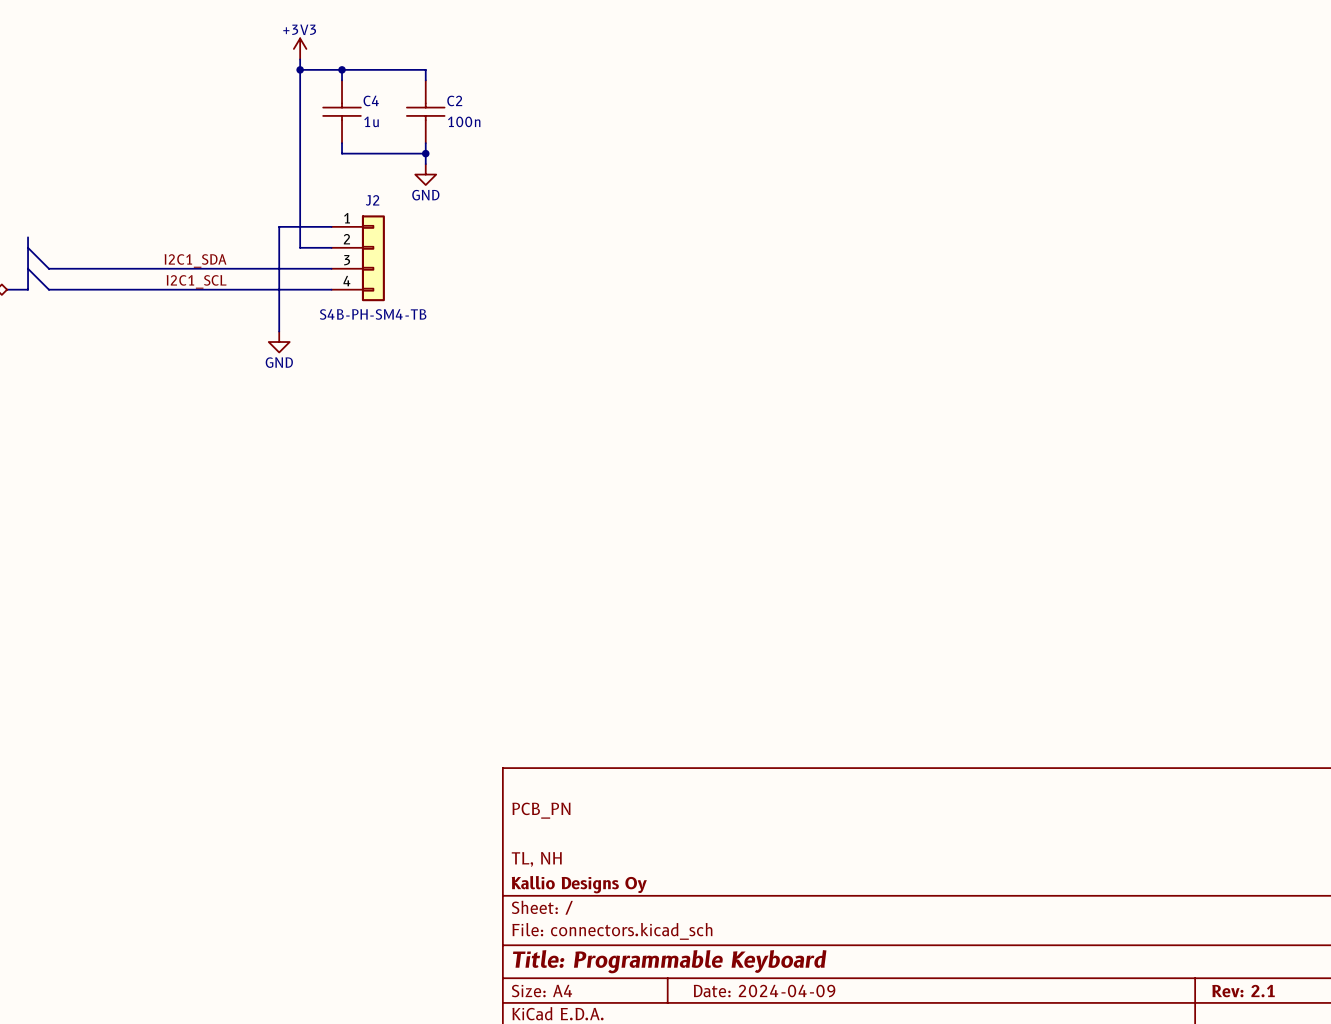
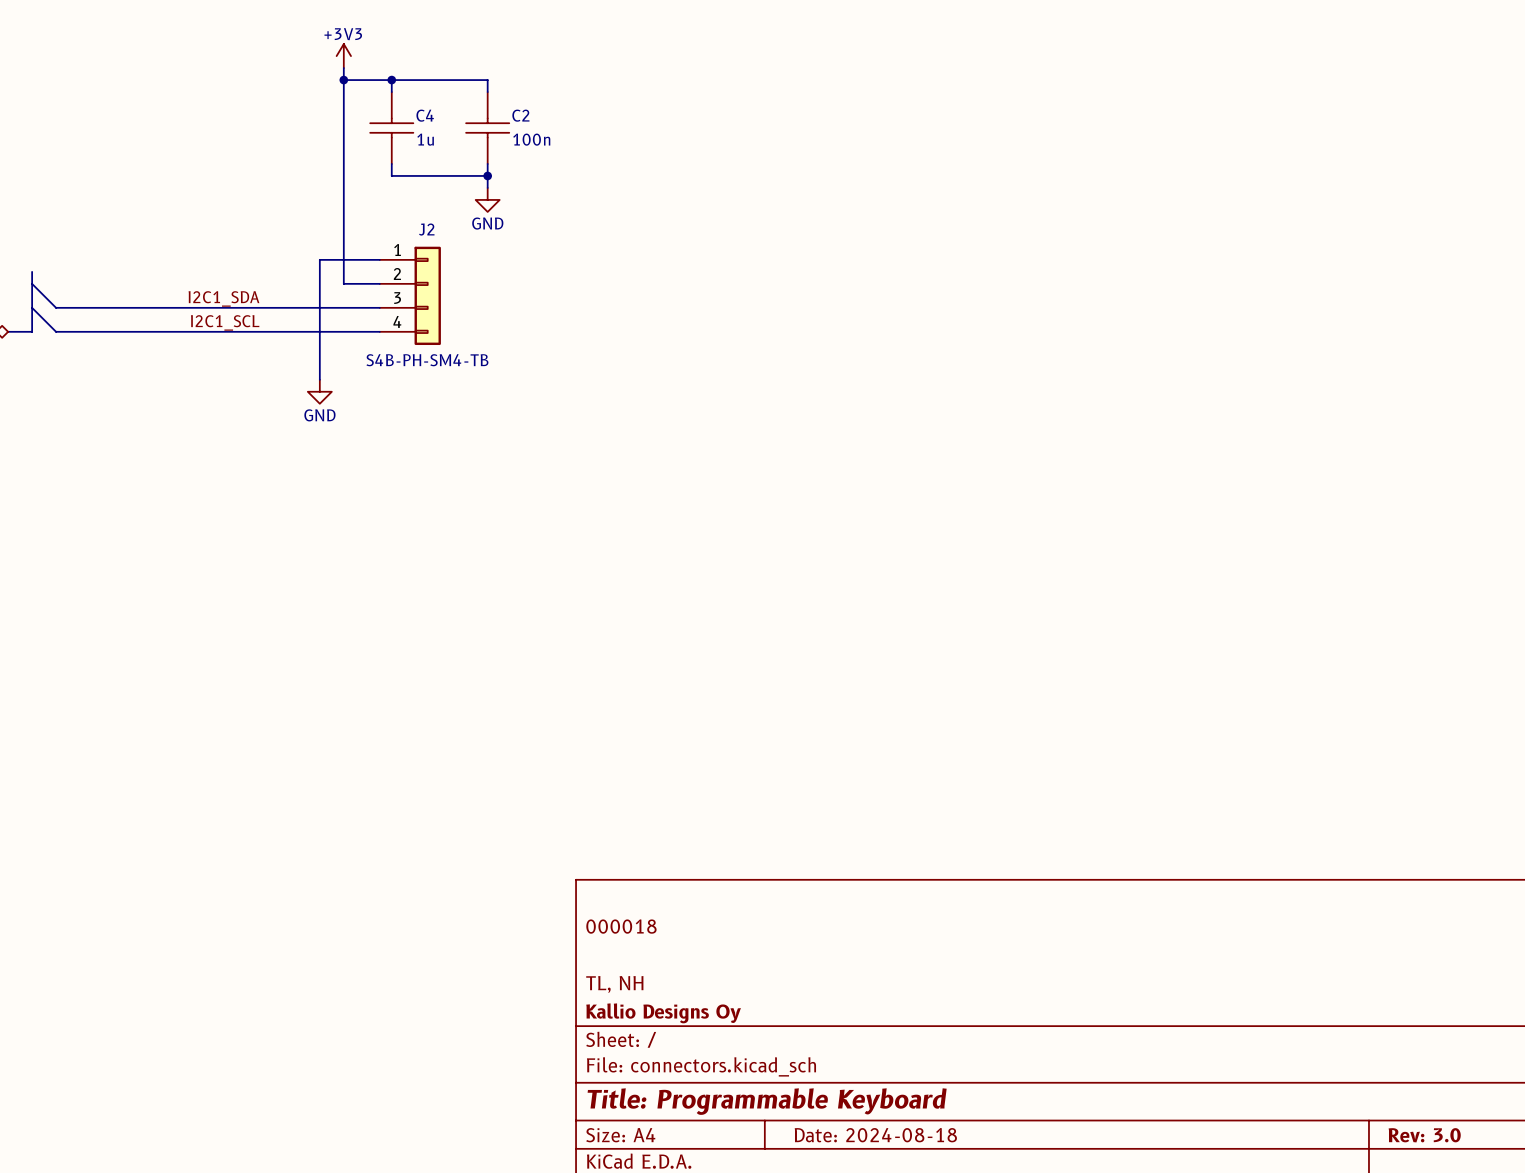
title block: PCB_PN (541, 810) -> 000018 (621, 926)
title block: Date: 2024-04-09 (764, 991) -> Date: 2024-08-18 (875, 1135)
title block: Rev: 2.1 (1243, 991) -> Rev: 3.0 (1424, 1135)

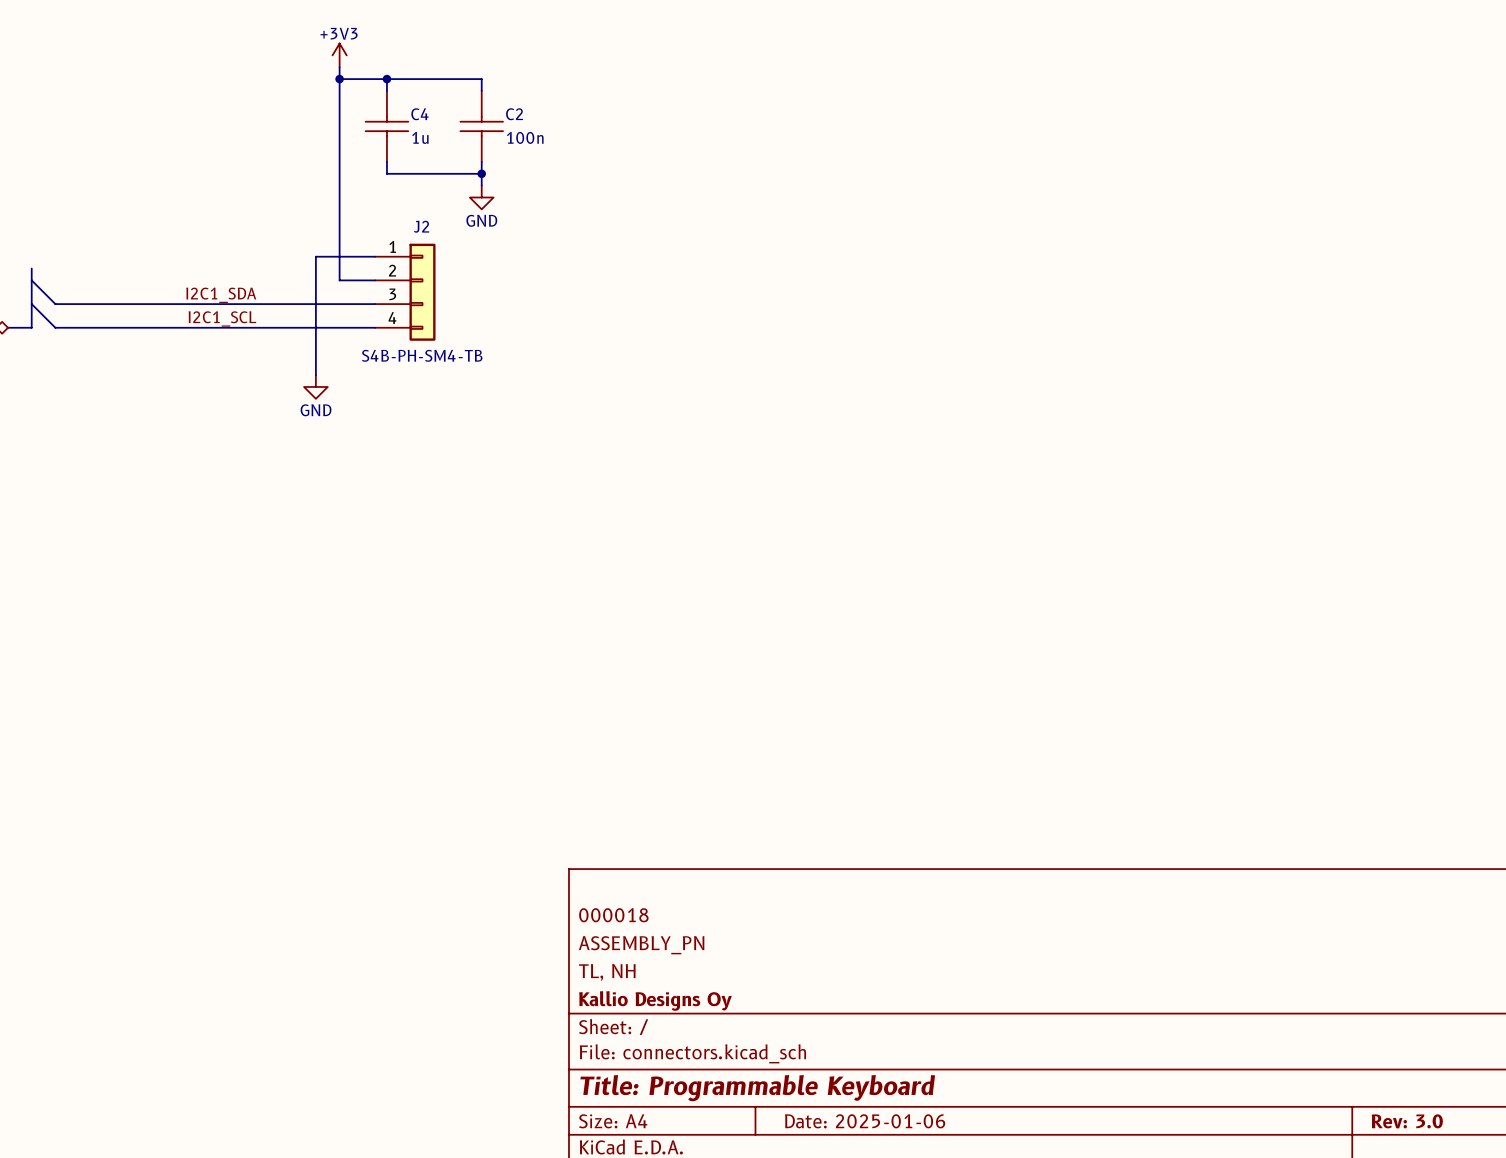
title block: none -> ASSEMBLY_PN (641, 945)
title block: Date: 2024-08-18 (875, 1135) -> Date: 2025-01-06 (865, 1121)

